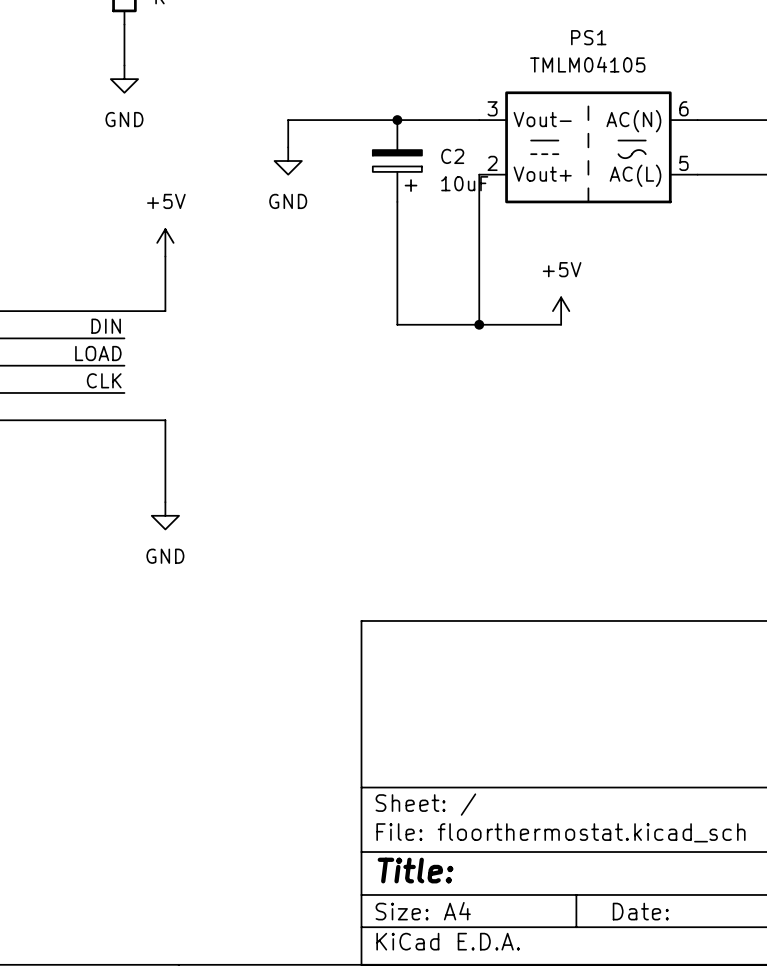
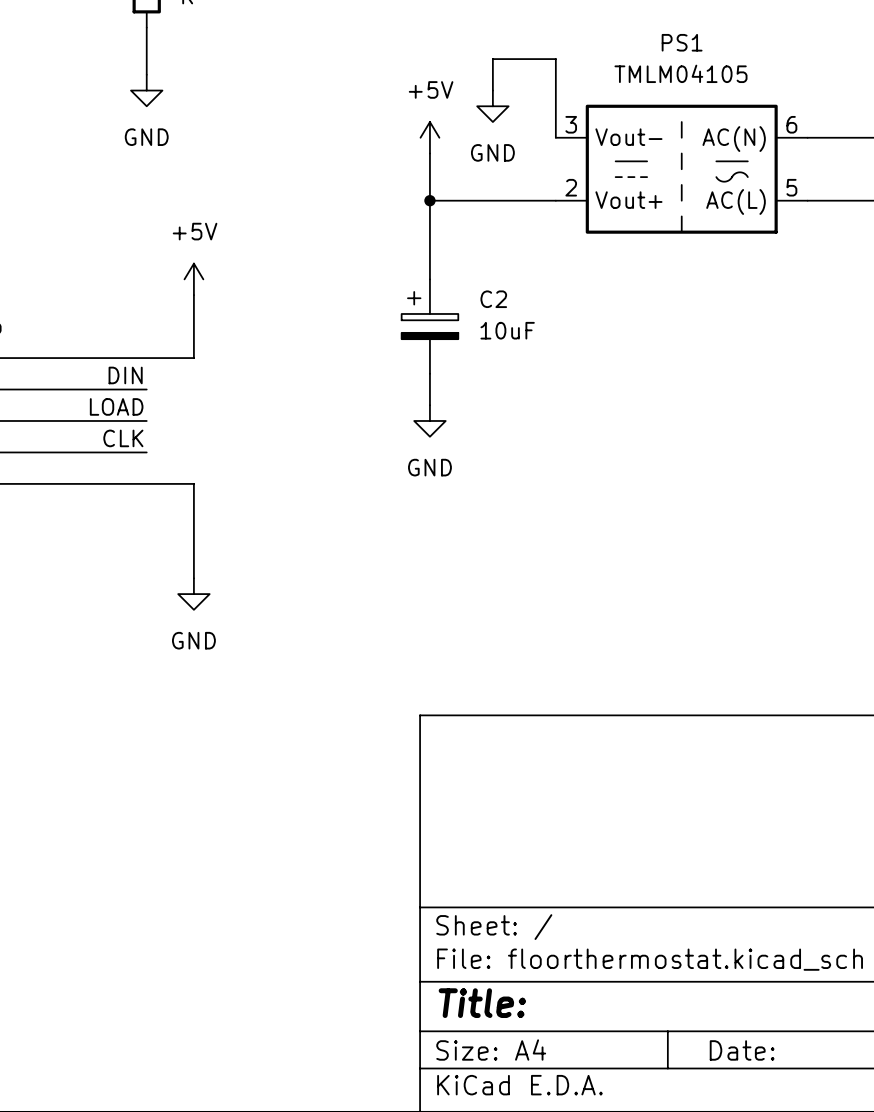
power symbol: none -> GND (492, 106)
power symbol: none -> +5V (429, 137)
junction position: (397, 120) -> (429, 200)
wire: (479, 120) (288, 120) (288, 147) -> (555, 137) (555, 59) (492, 59) (492, 90)
wire: none -> (429, 153) (429, 279)
power symbol: GND (288, 161) -> none
C2 position: (397, 161) -> (429, 326)
C2 rotation: 0° (397, 170) -> 180° (429, 315)
wire: (479, 174) (479, 324) -> (555, 200) (429, 200)
wire: (397, 201) (397, 324) (561, 324) -> none
power symbol: +5V (561, 311) -> none
wire: none -> (429, 373) (429, 405)
junction: (479, 324) -> none
power symbol: none -> GND (429, 420)

